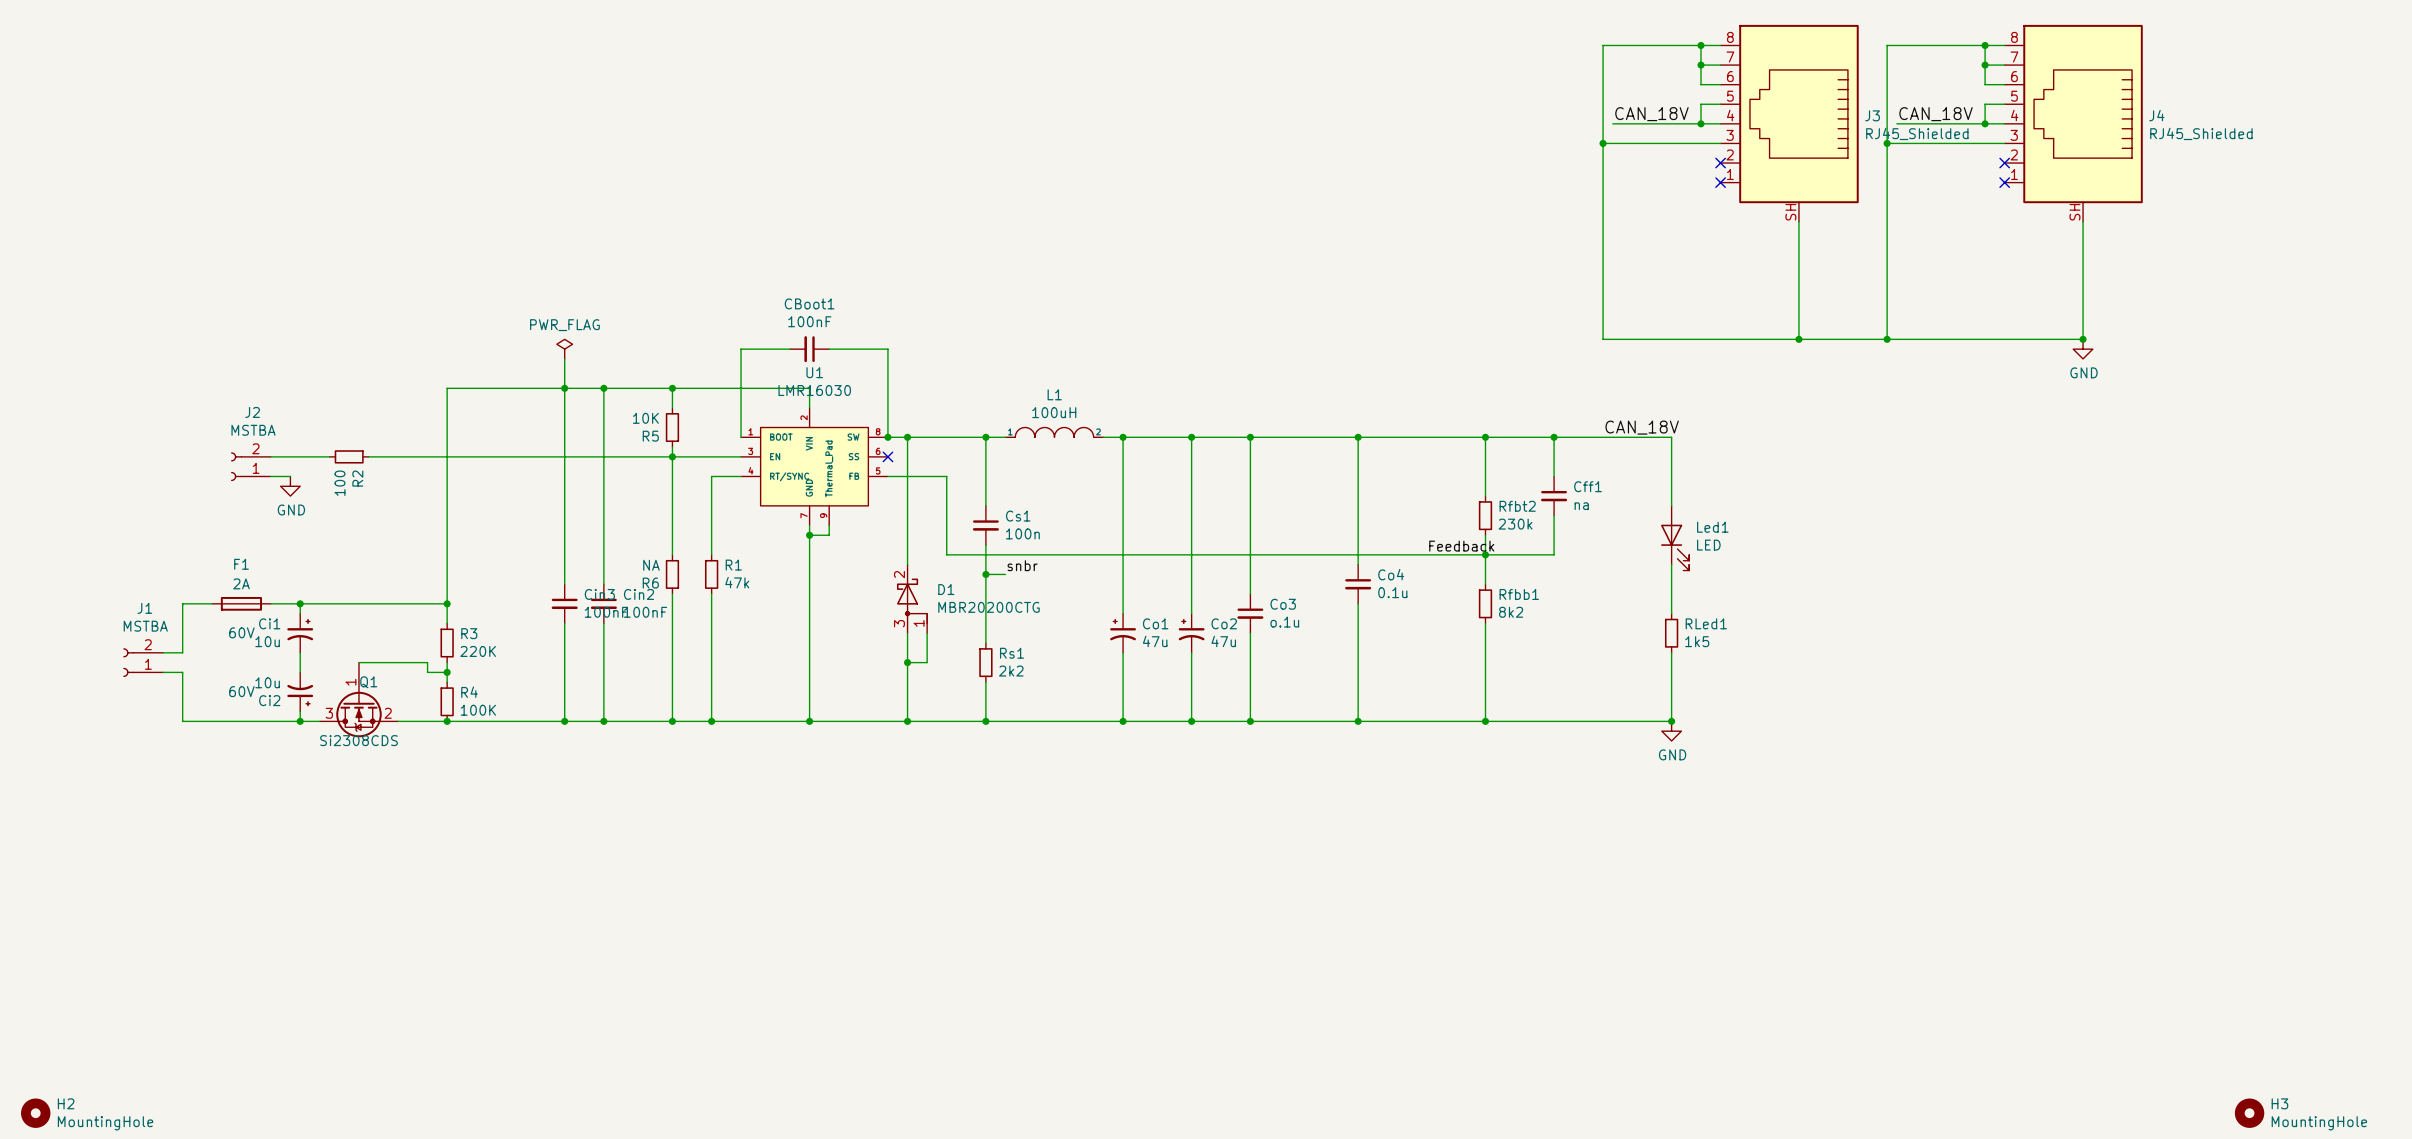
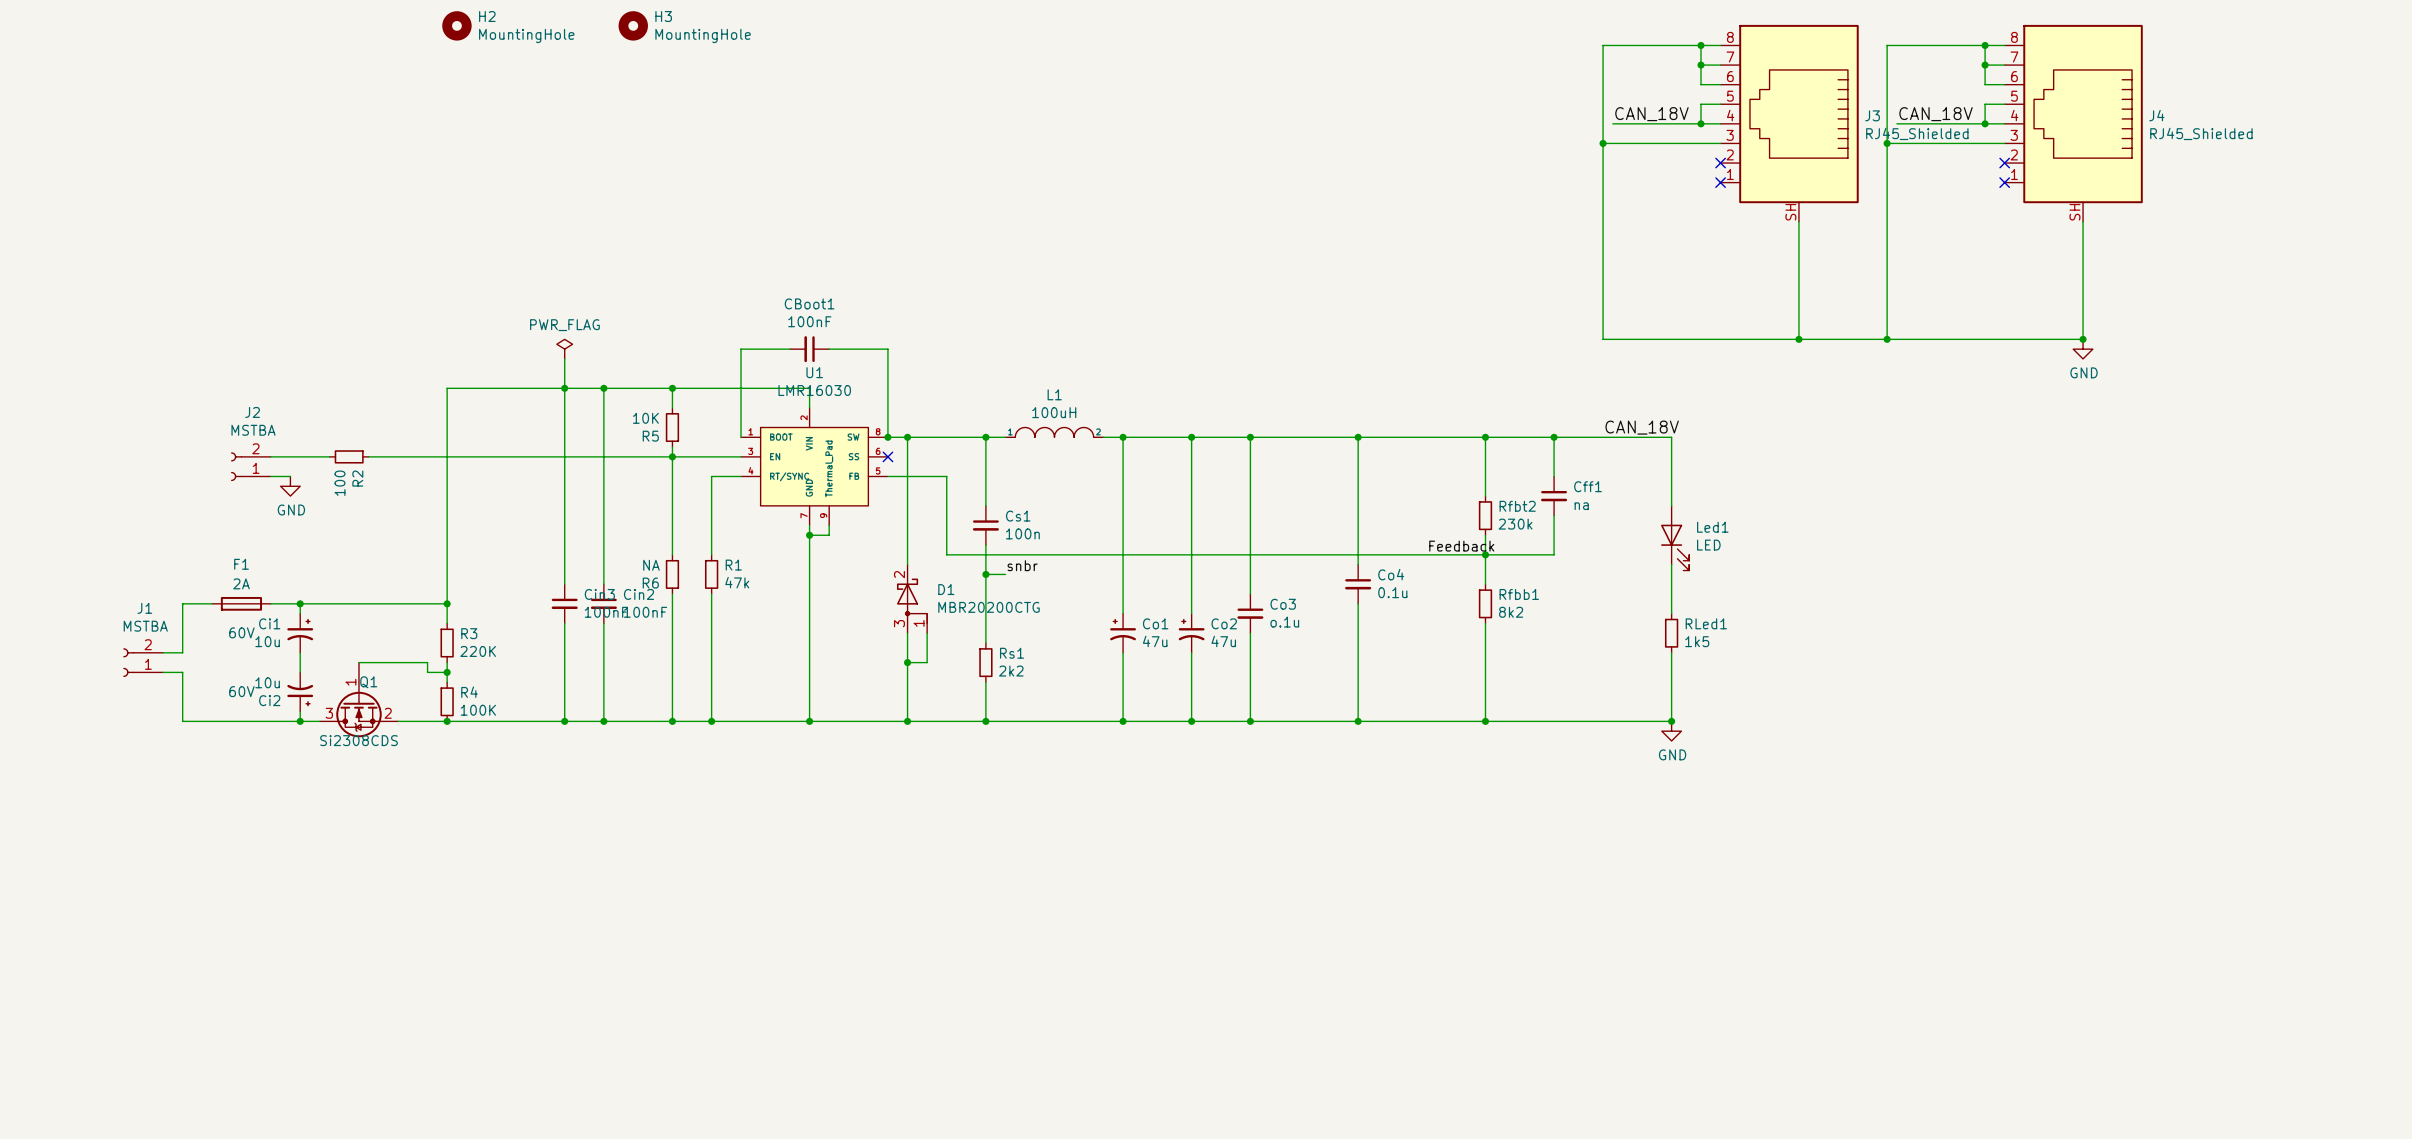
H2 position: (35, 1113) -> (456, 25)
H3 position: (2249, 1113) -> (633, 25)

